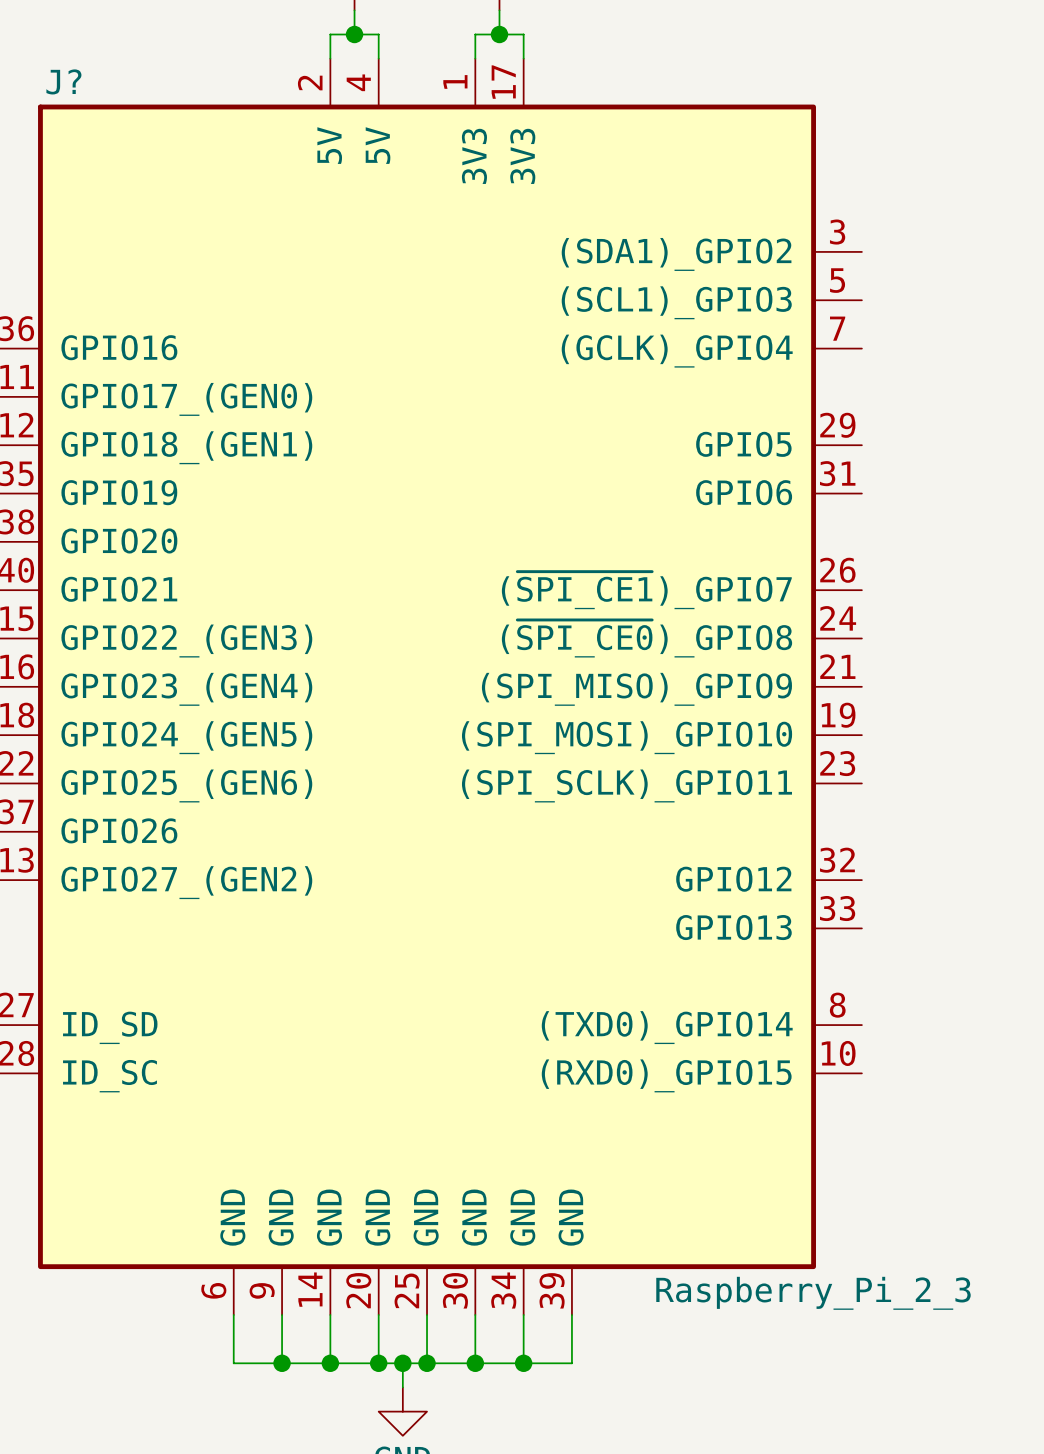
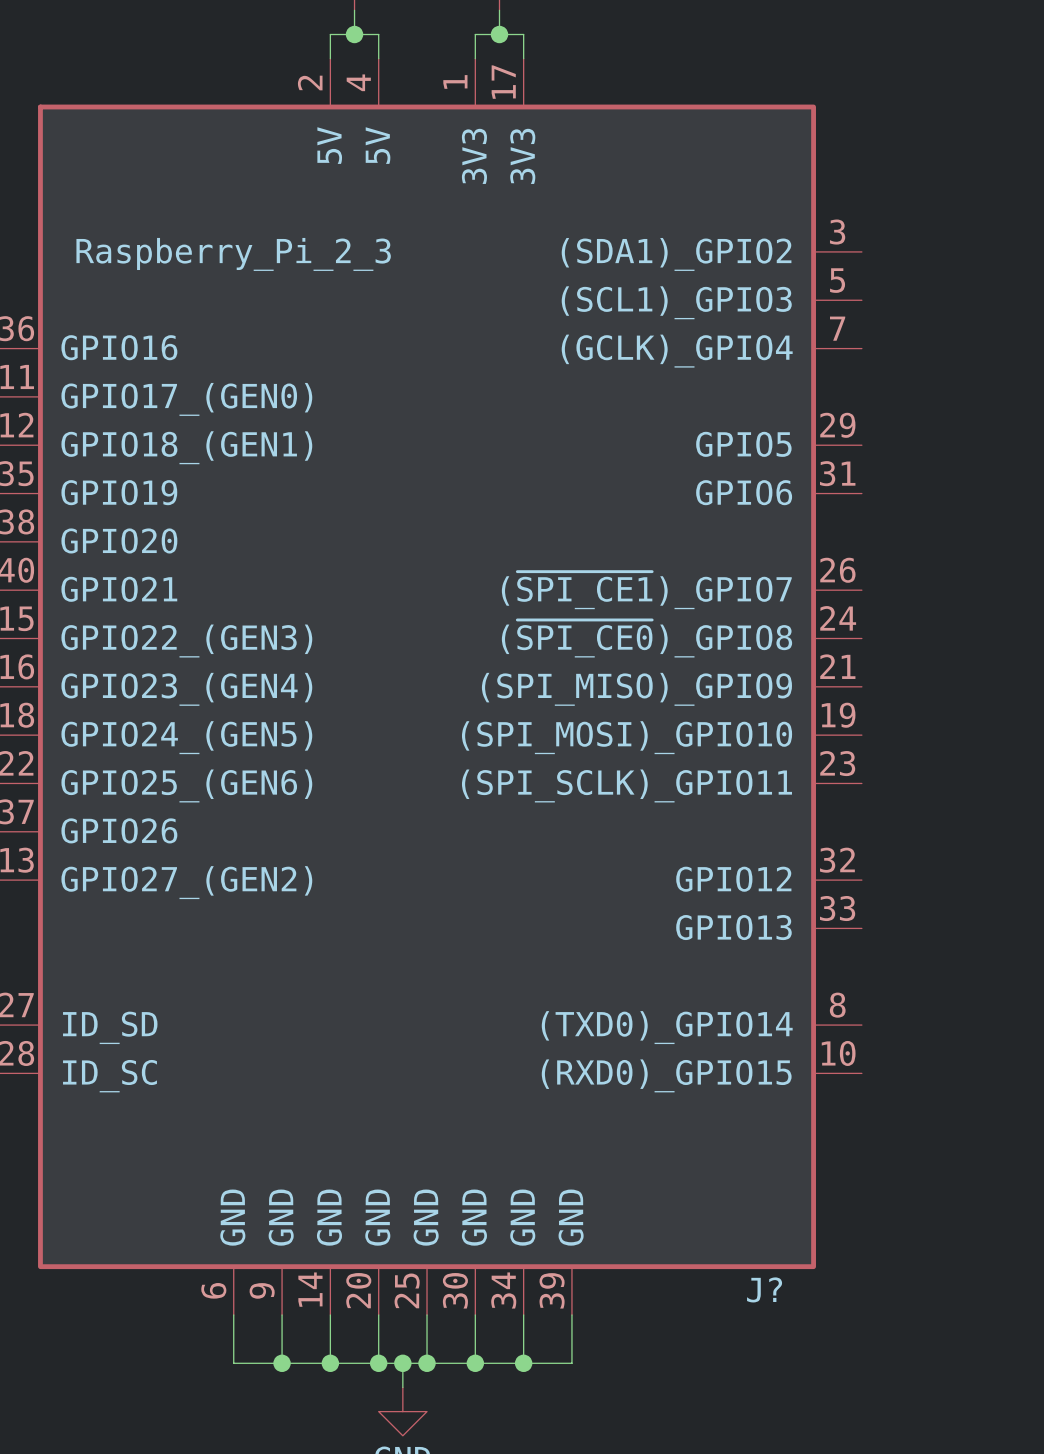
J? name position: J? (63, 81) -> J? (764, 1289)
J? value position: Raspberry_Pi_2_3 (813, 1293) -> Raspberry_Pi_2_3 (233, 254)

